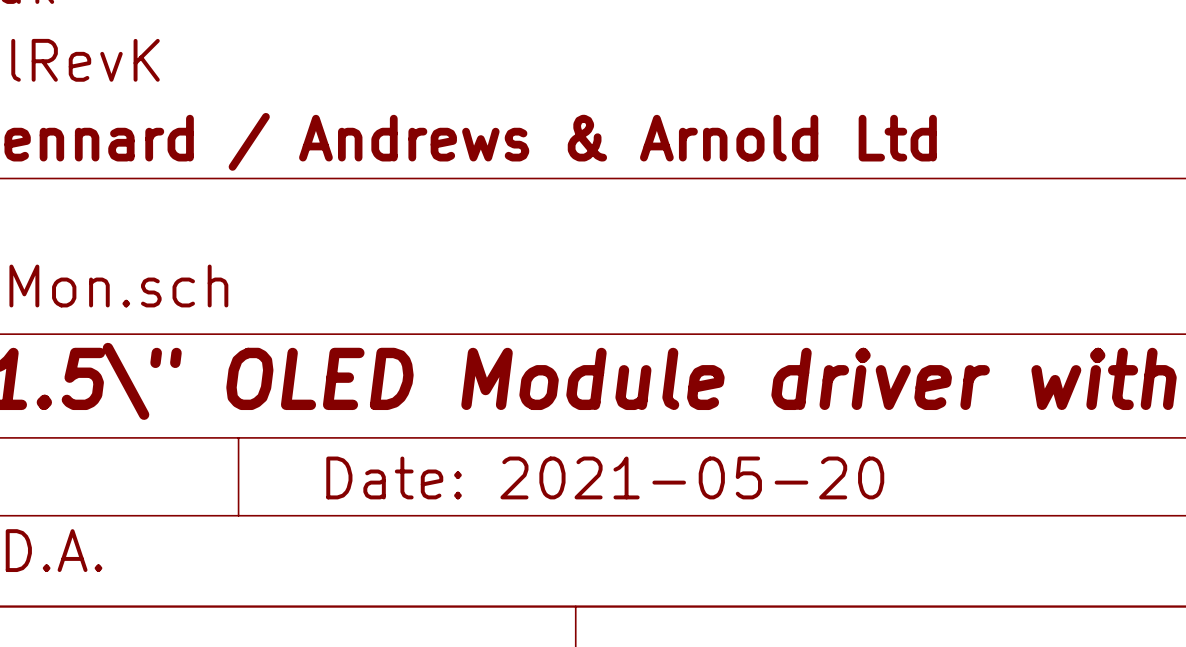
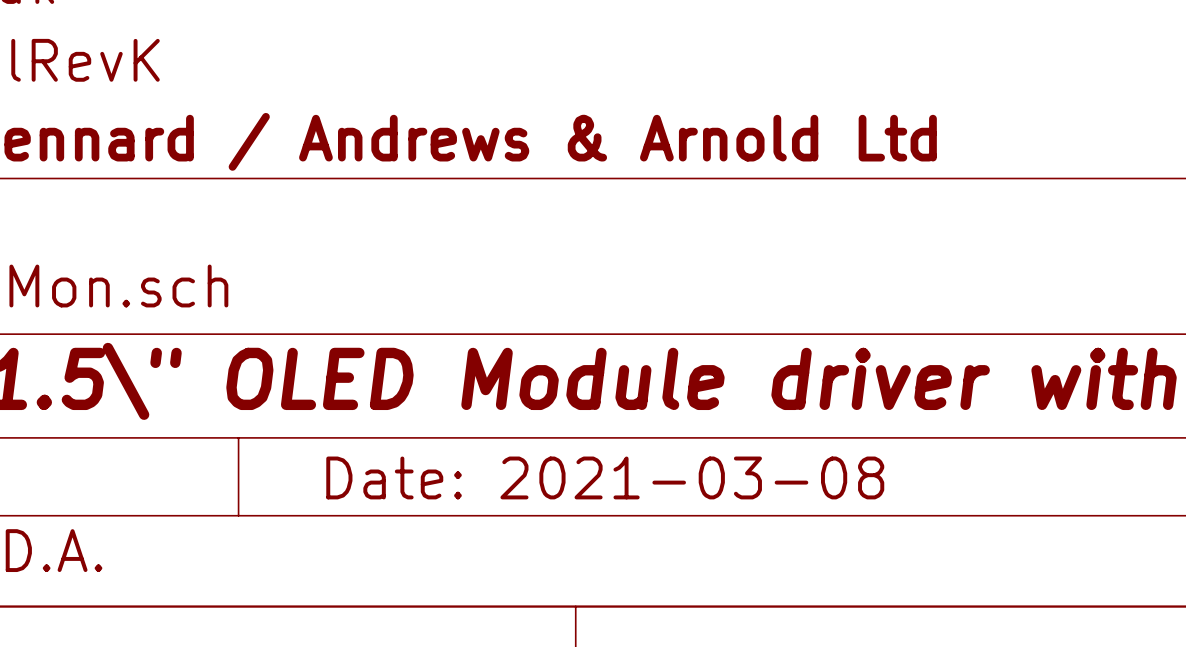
title block: Date: 2021-05-20 (605, 477) -> Date: 2021-03-08 (605, 477)

